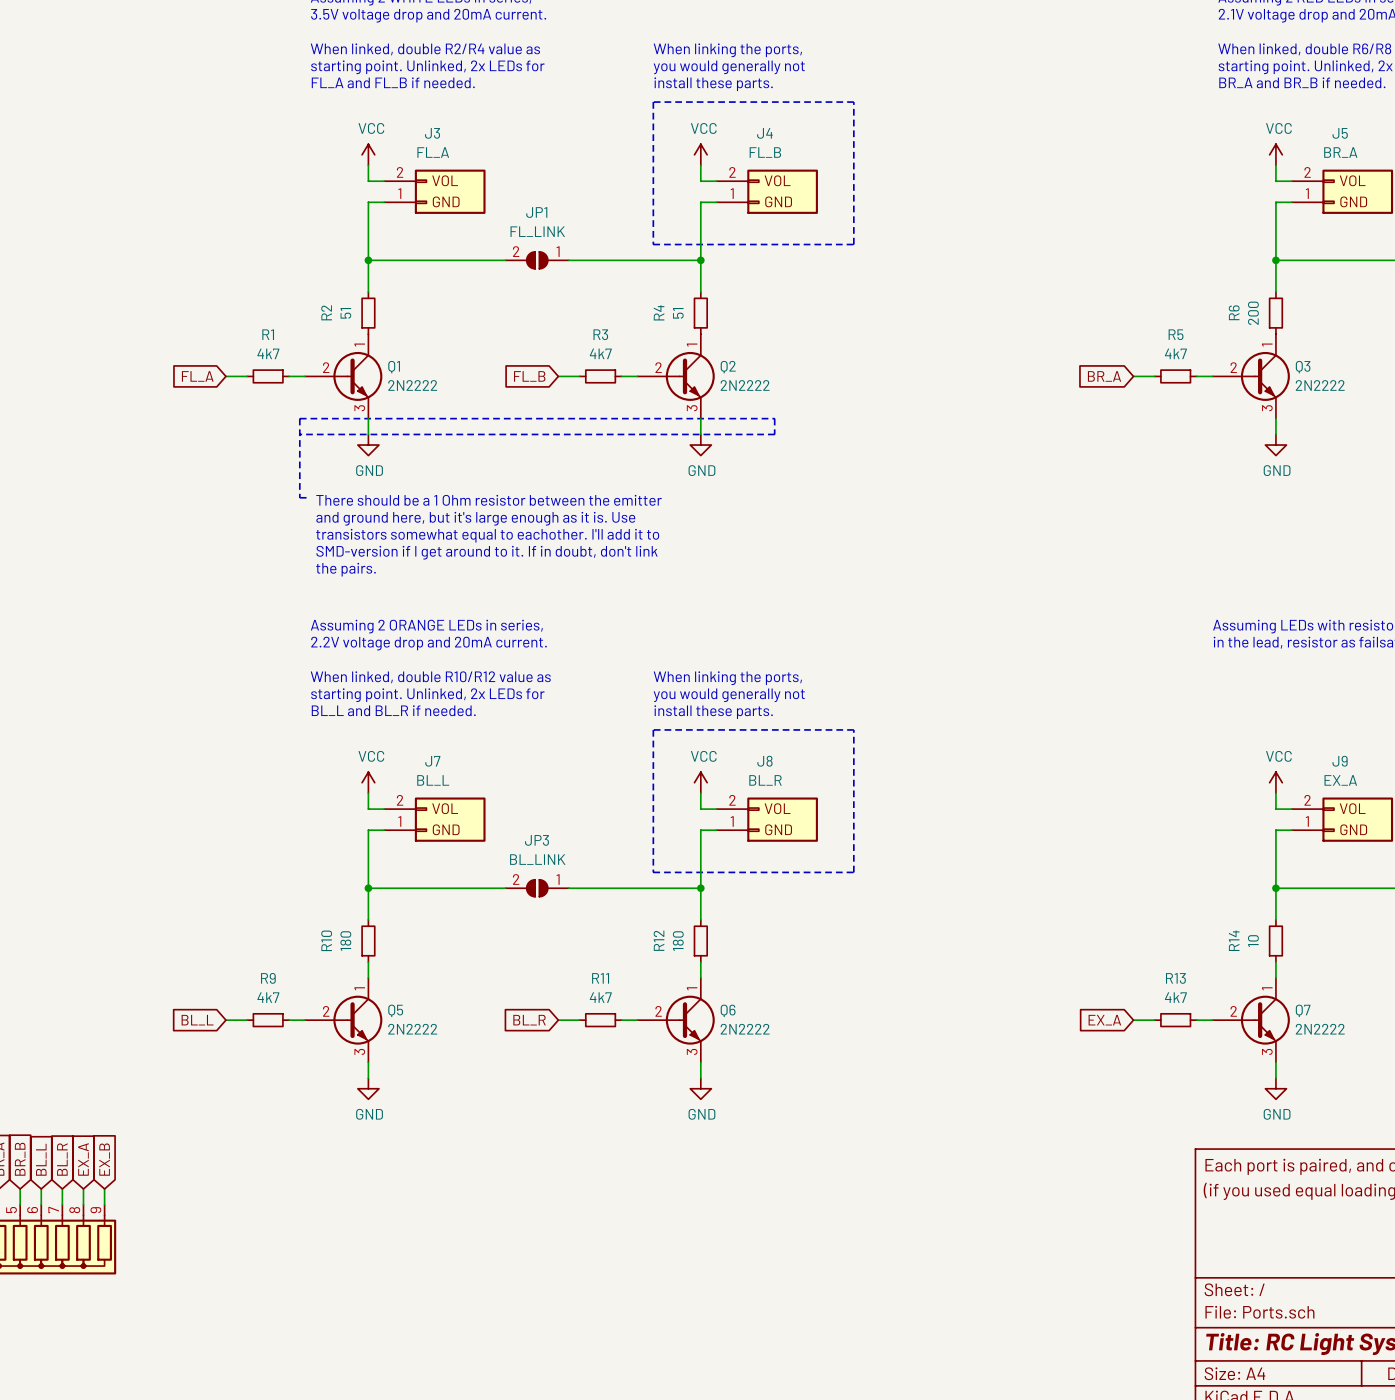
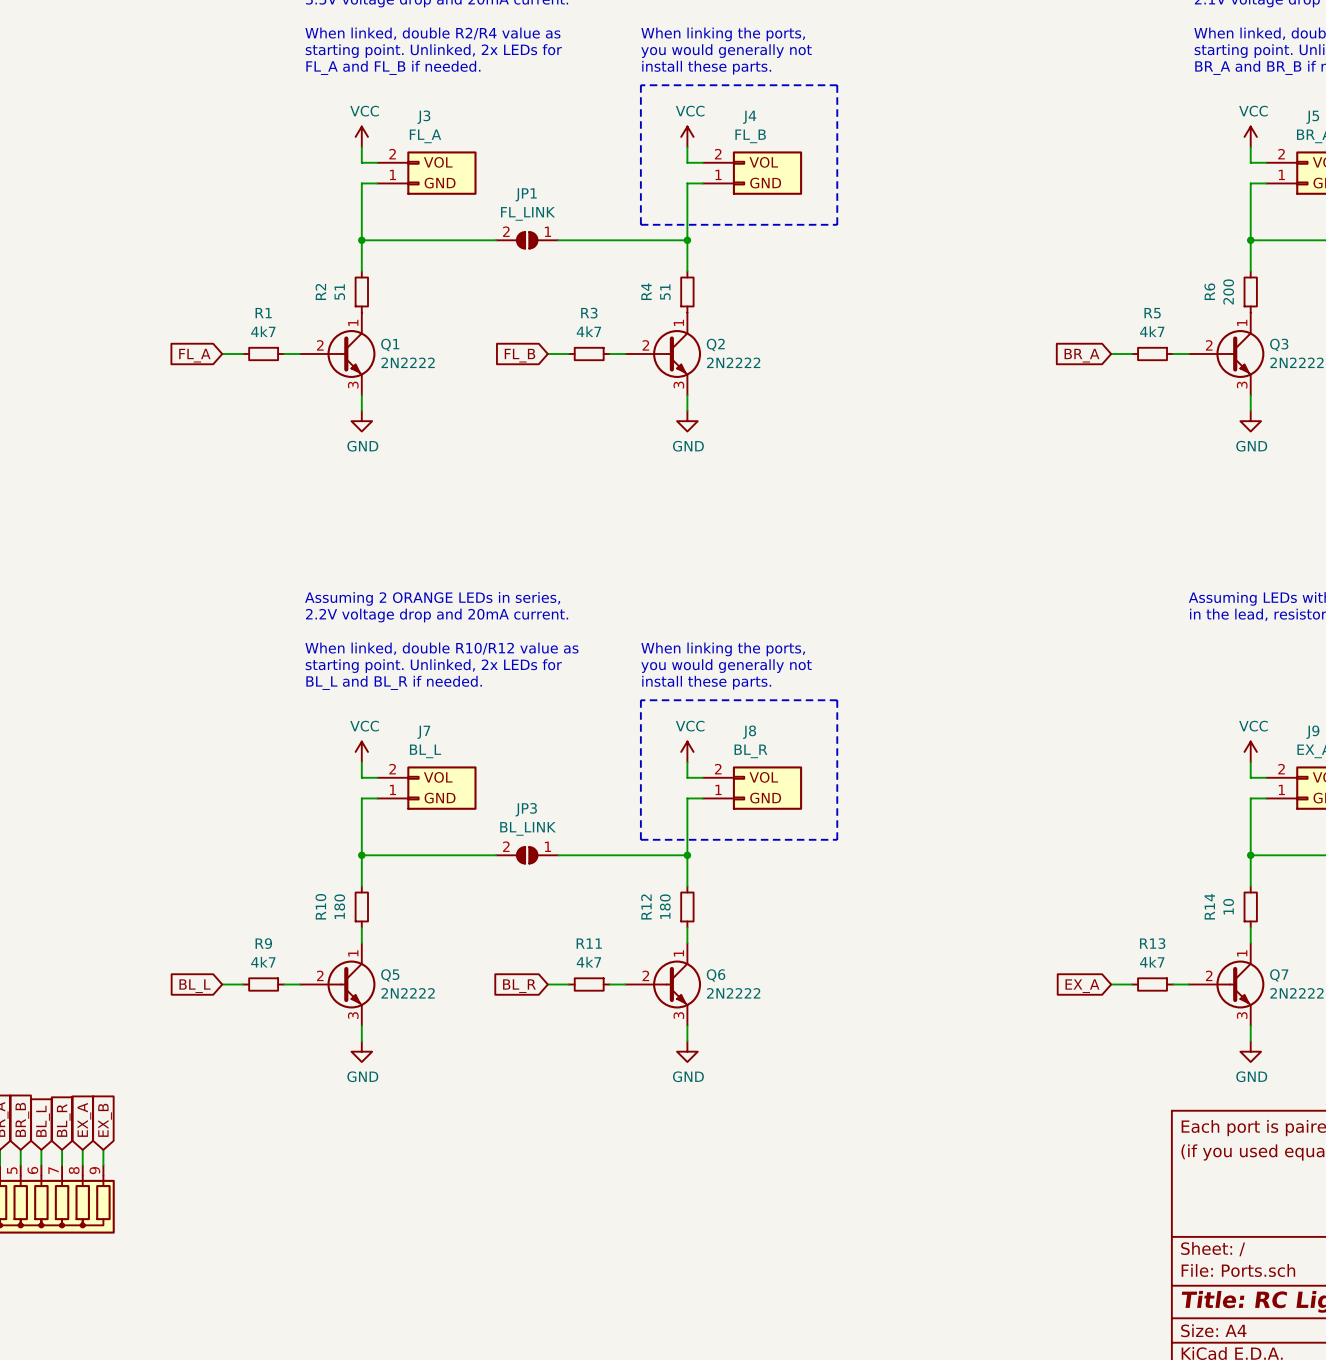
line: (299, 434) (774, 434) (774, 418) (299, 418) (299, 497) (310, 497) -> none
text: There should be a 1 Ohm resistor between the emitter (489, 500) -> none
text: and ground here, but it's large enough as it is. Use (475, 518) -> none
text: transistors somewhat equal to eachother. I'll add it to (487, 535) -> none
text: SMD-version if I get around to it. If in doubt, don't link (487, 552) -> none
text: the pairs. (346, 569) -> none

